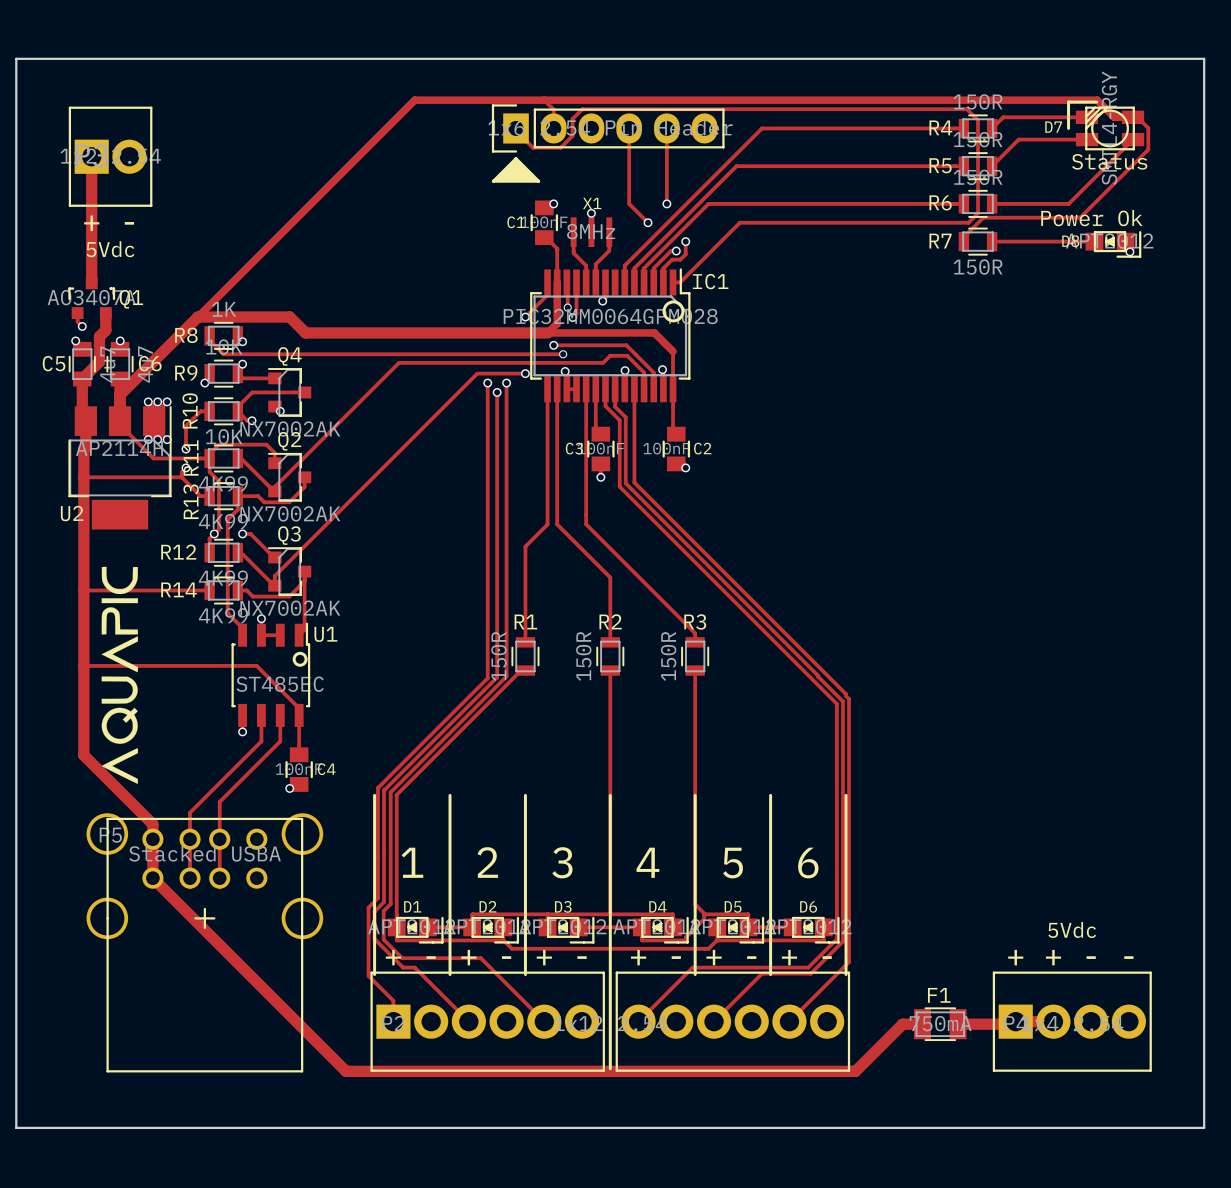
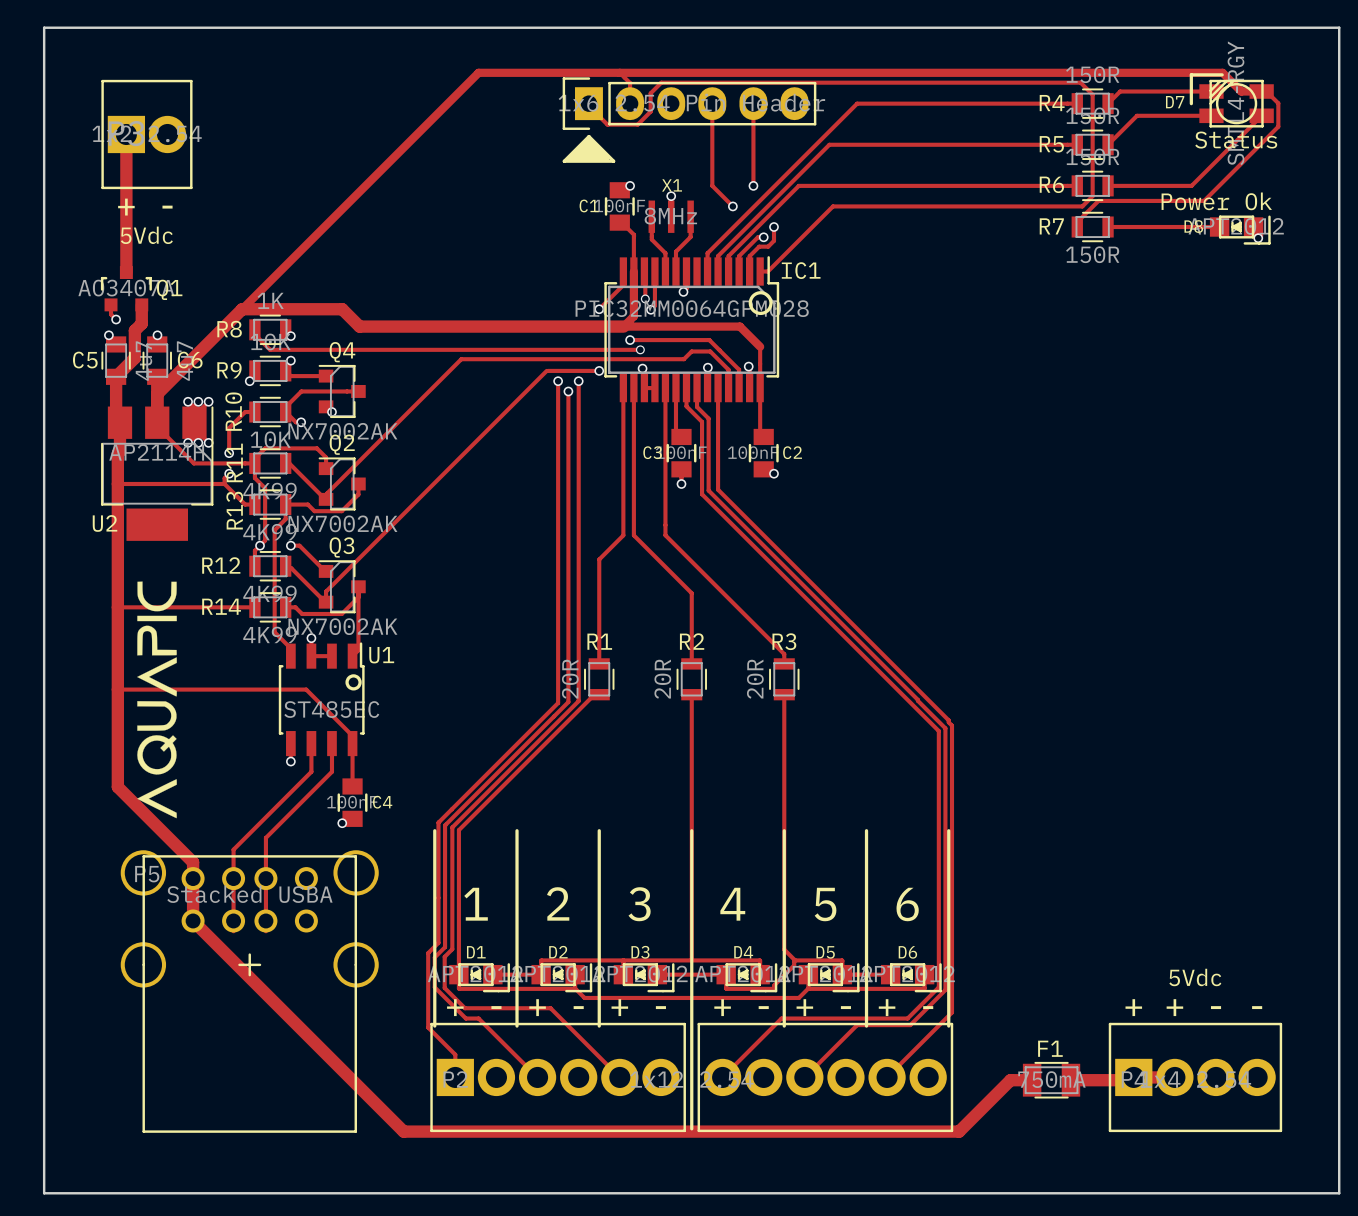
R1 value: 150R (498, 656) -> 20R (570, 679)
R2 value: 150R (583, 656) -> 20R (662, 679)
R3 value: 150R (668, 656) -> 20R (755, 679)

